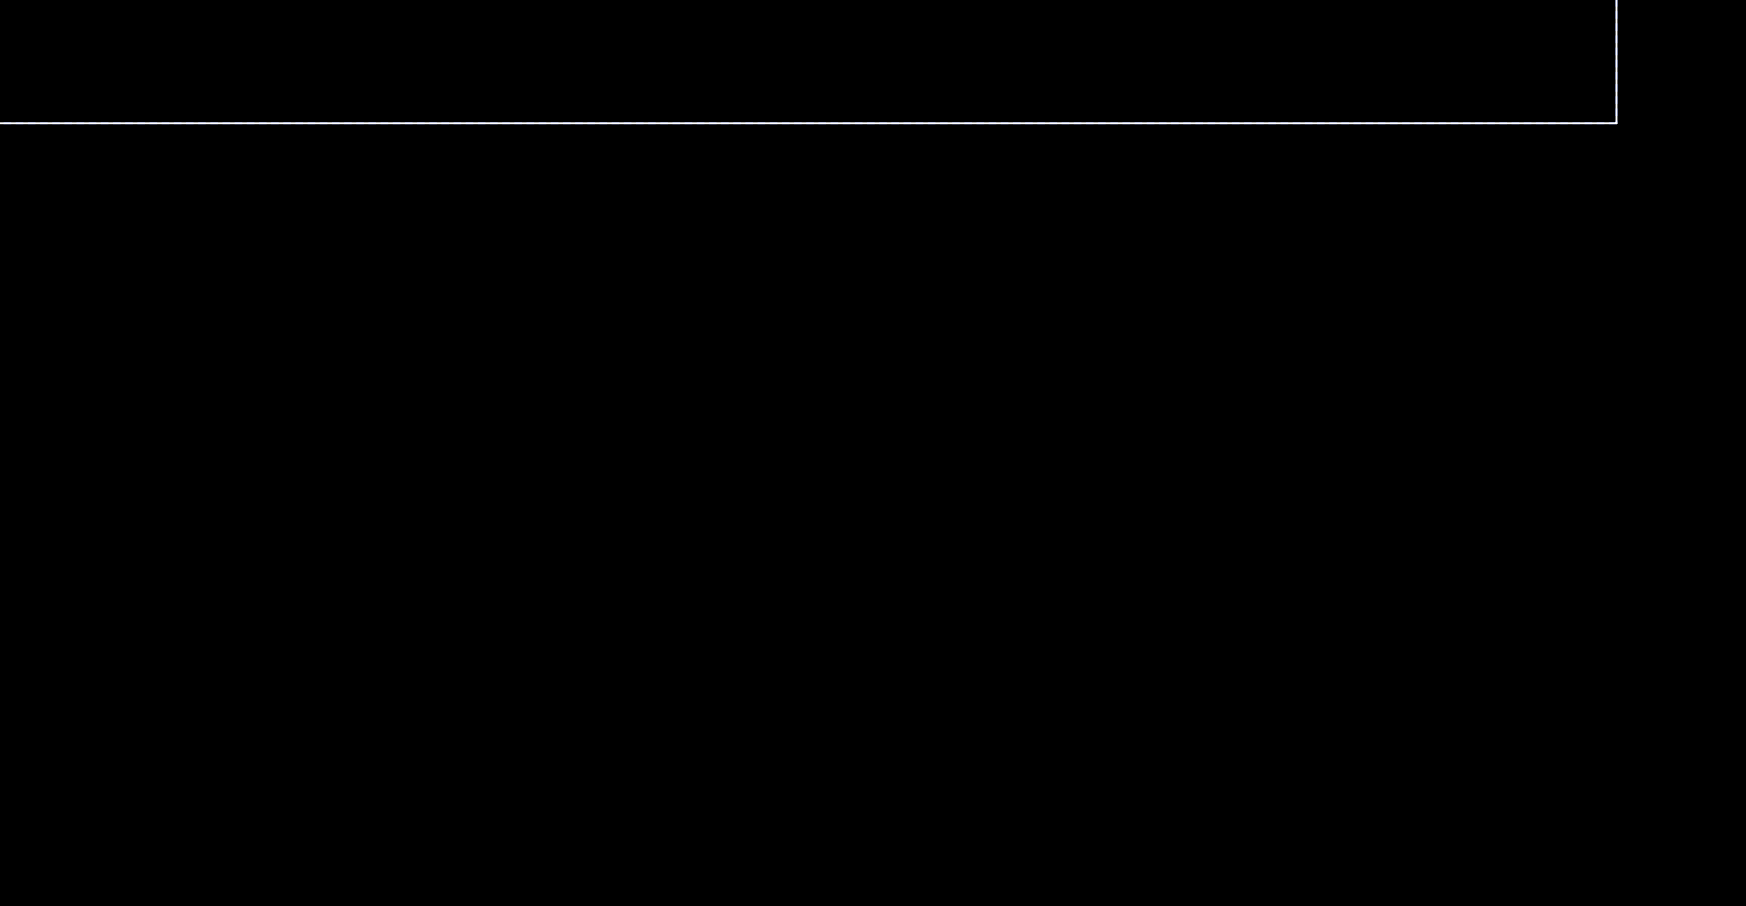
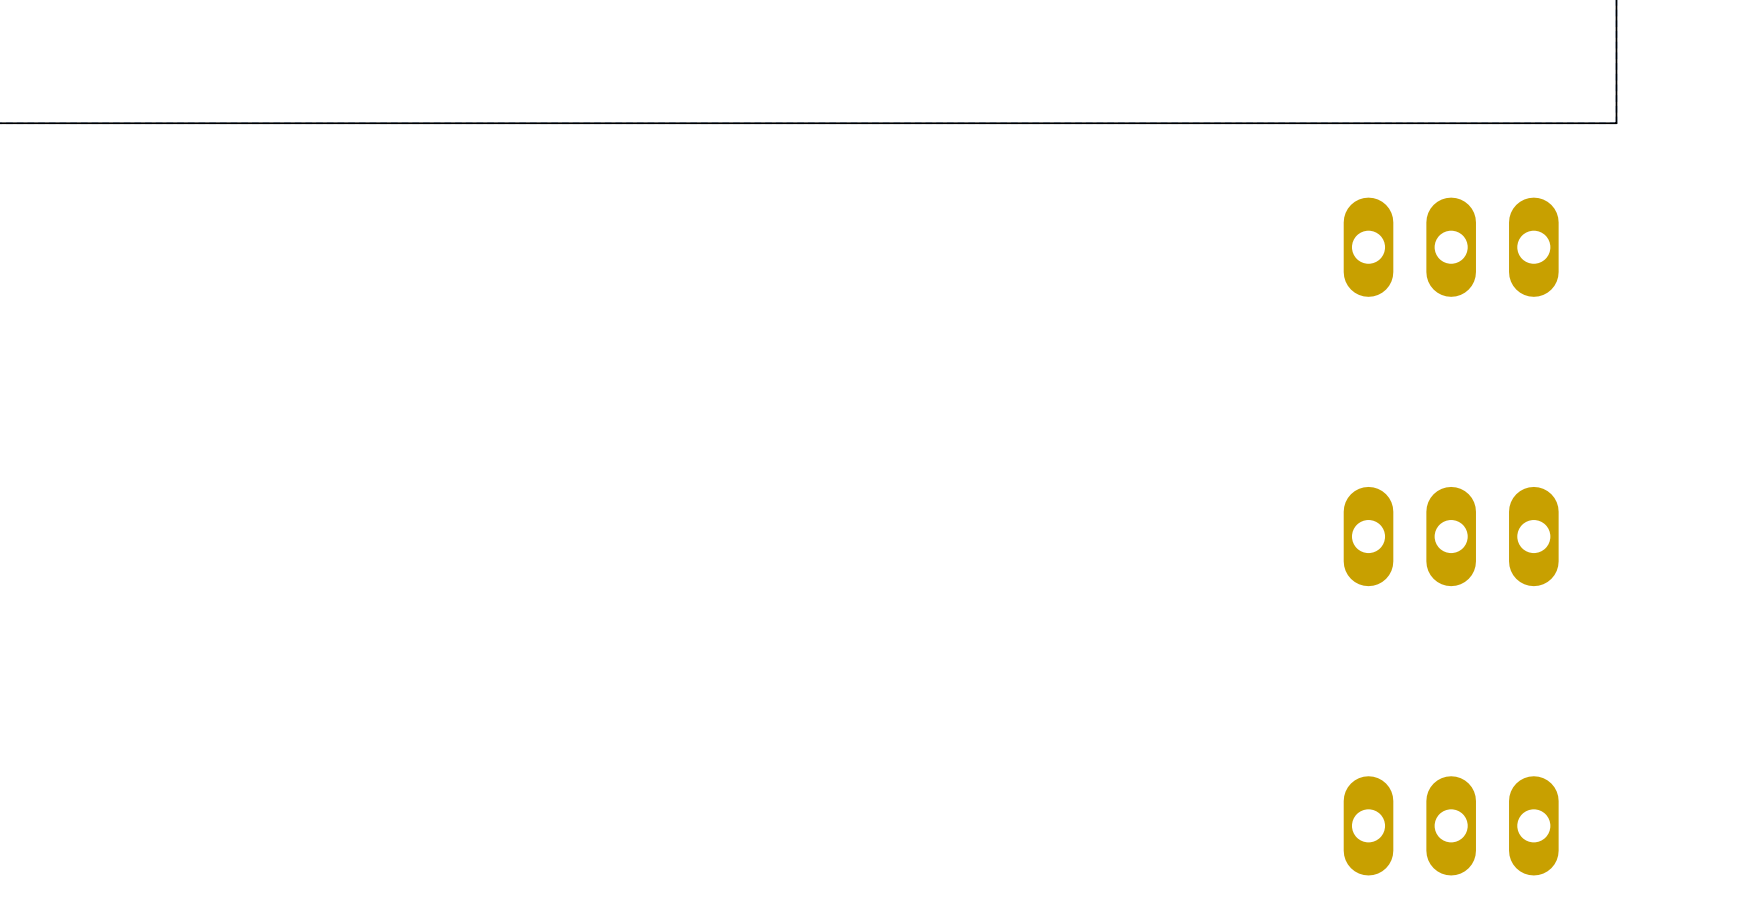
part: none -> (1451, 247)
part: none -> (1451, 536)
part: none -> (1451, 825)

